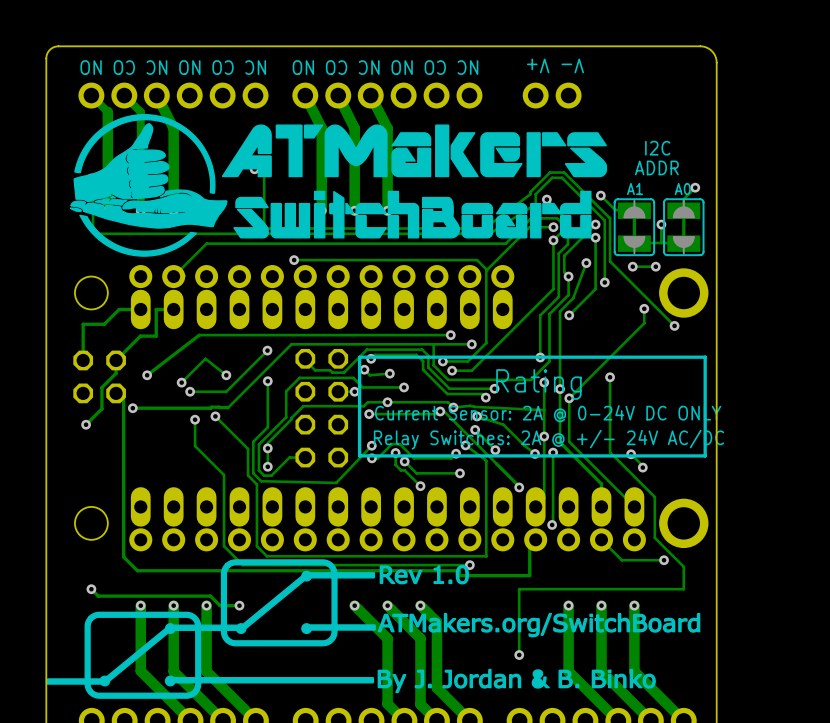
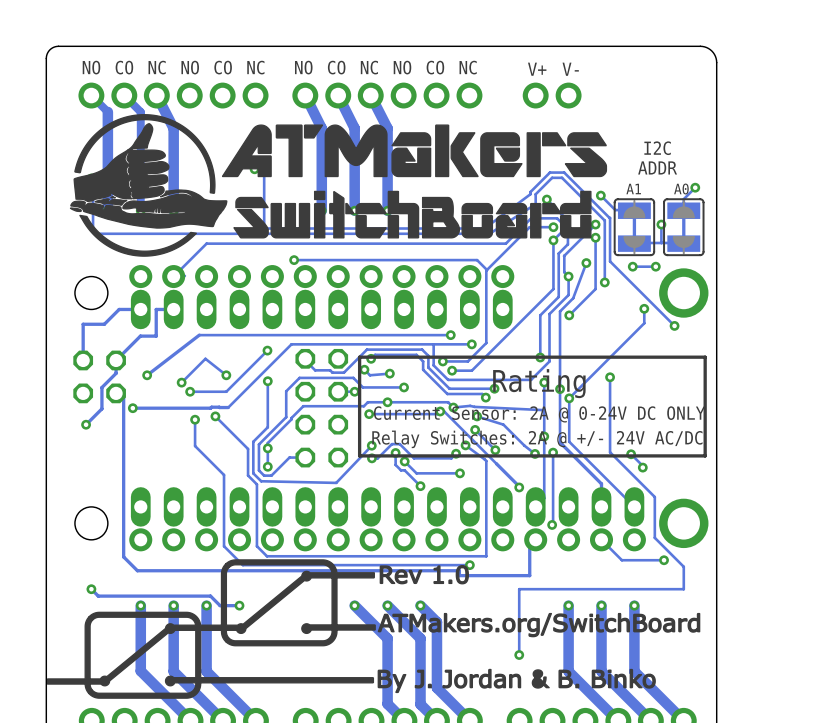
text rotation: 0° (538, 65) -> 180° (537, 69)
text rotation: 0° (572, 65) -> 180° (570, 69)
text rotation: 0° (91, 67) -> 180° (91, 67)
text rotation: 0° (124, 67) -> 180° (124, 67)
text rotation: 0° (156, 67) -> 180° (157, 67)
text rotation: 0° (189, 67) -> 180° (190, 67)
text rotation: 0° (223, 67) -> 180° (223, 67)
text rotation: 0° (255, 67) -> 180° (255, 67)
text rotation: 0° (303, 67) -> 180° (303, 67)
text rotation: 0° (336, 67) -> 180° (336, 67)
text rotation: 0° (369, 67) -> 180° (369, 67)
text rotation: 0° (402, 67) -> 180° (402, 67)
text rotation: 0° (435, 67) -> 180° (435, 67)
text rotation: 0° (467, 67) -> 180° (468, 67)

